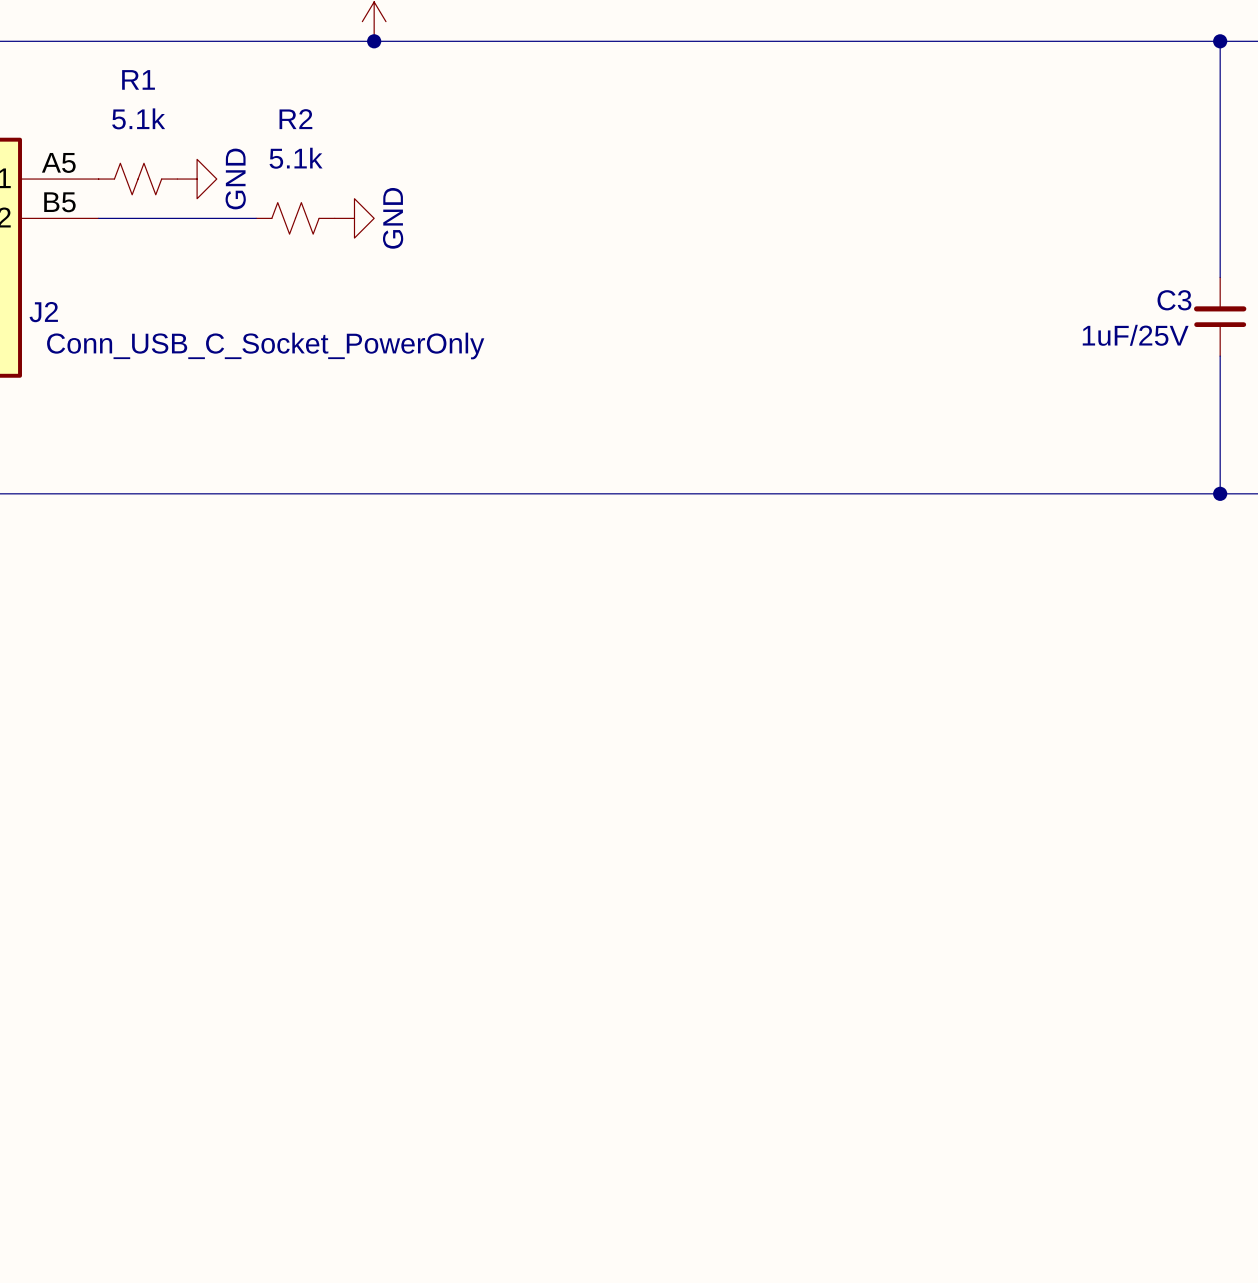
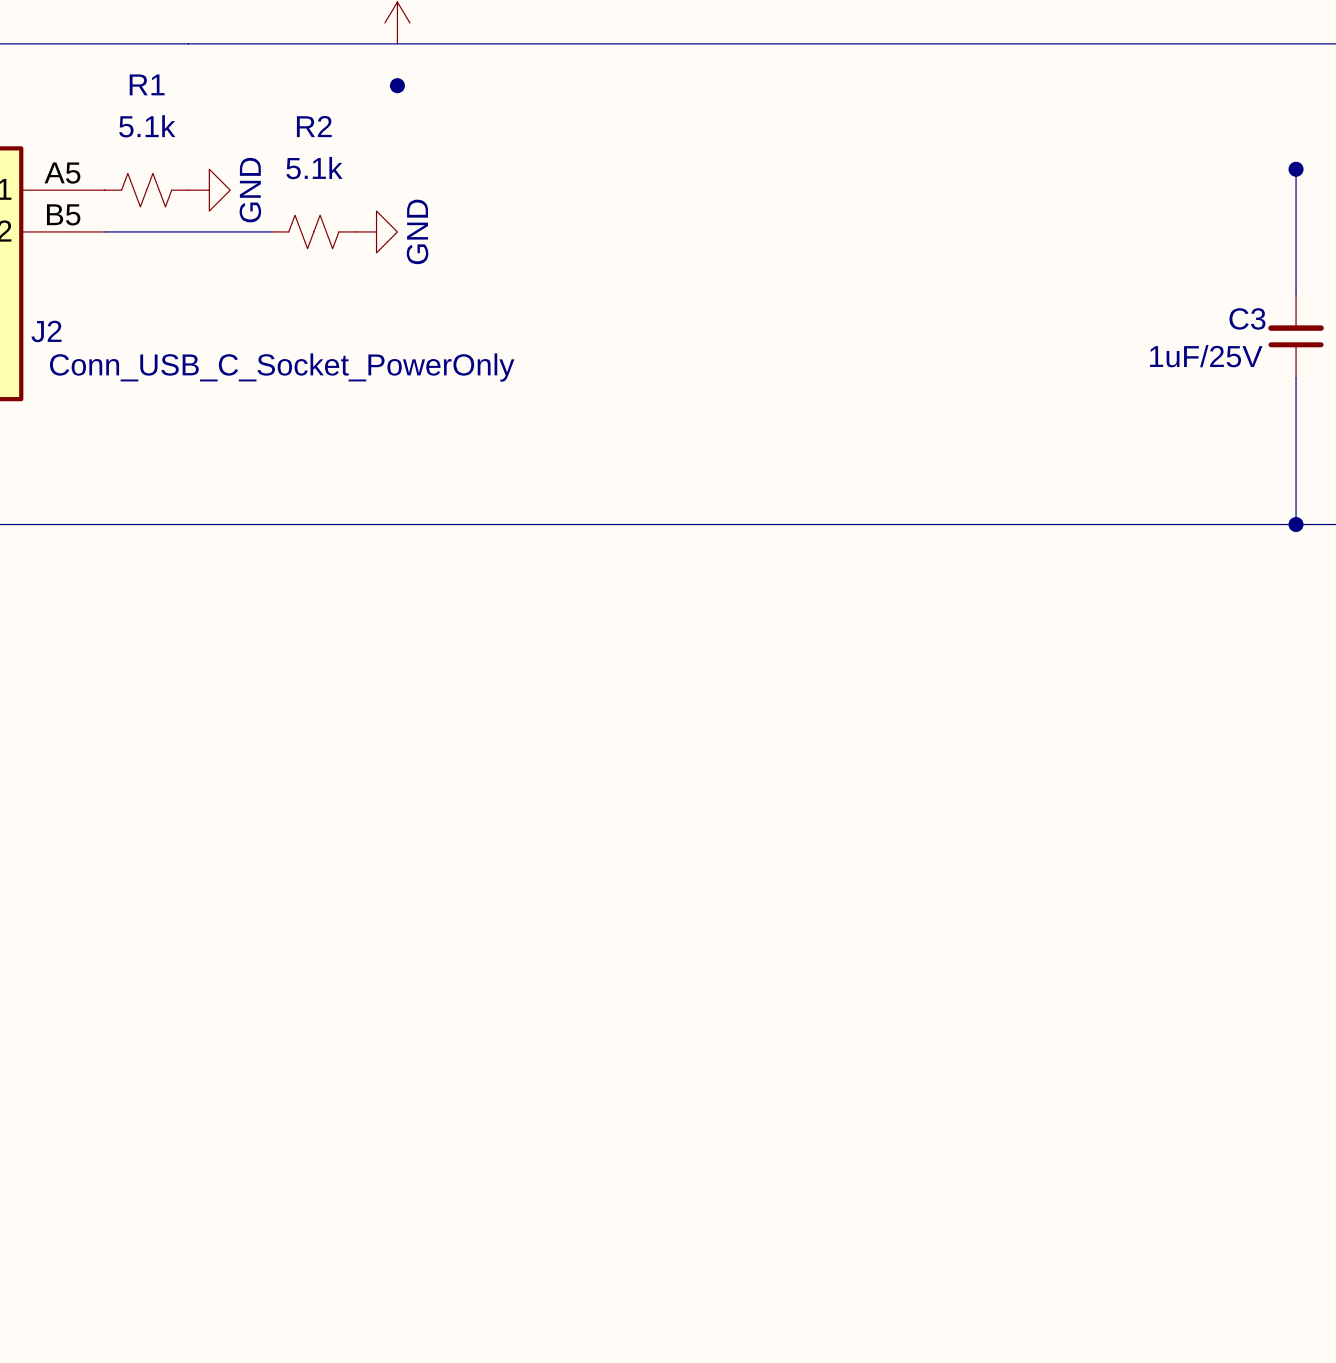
junction position: (374, 41) -> (397, 85)
wire: (1220, 41) (1220, 159) -> none
junction: (1220, 41) -> none
junction: none -> (1296, 169)

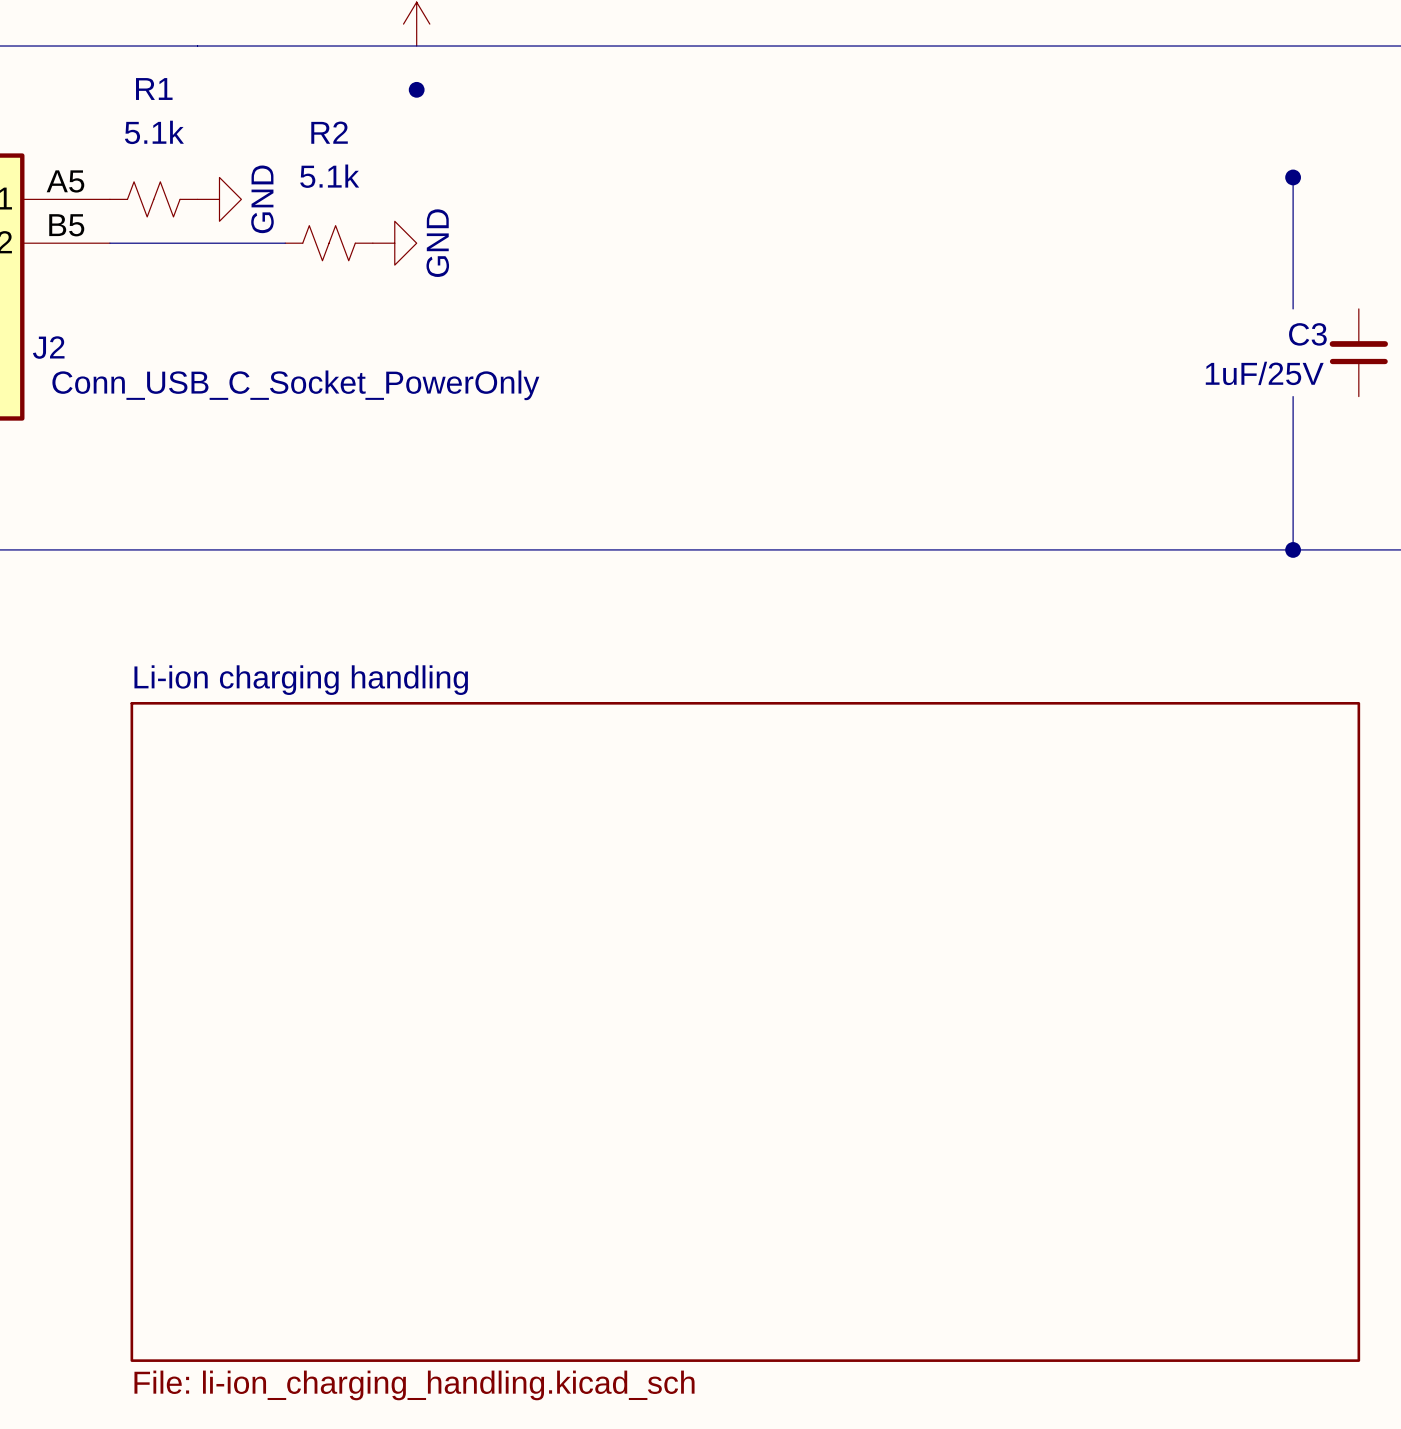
wire: (1296, 169) (1296, 294) -> (1293, 177) (1293, 308)
junction position: (1296, 169) -> (1293, 177)
wire: (1296, 378) (1296, 524) -> (1293, 396) (1293, 549)
junction position: (1296, 524) -> (1293, 549)
sheet Li-ion charging handling: none -> File: li-ion_charging_handling.kicad_sch (745, 1031)

